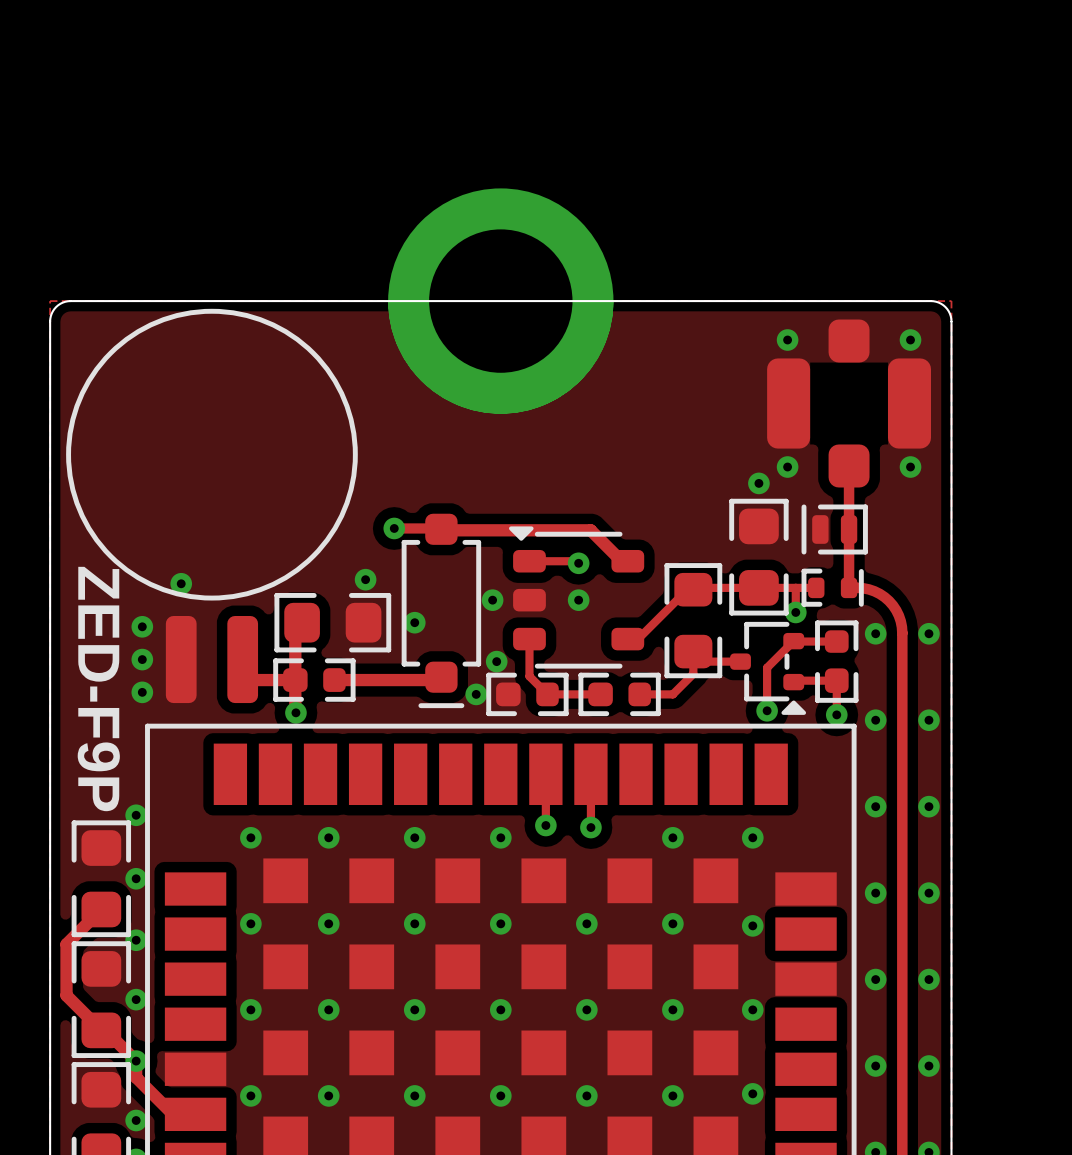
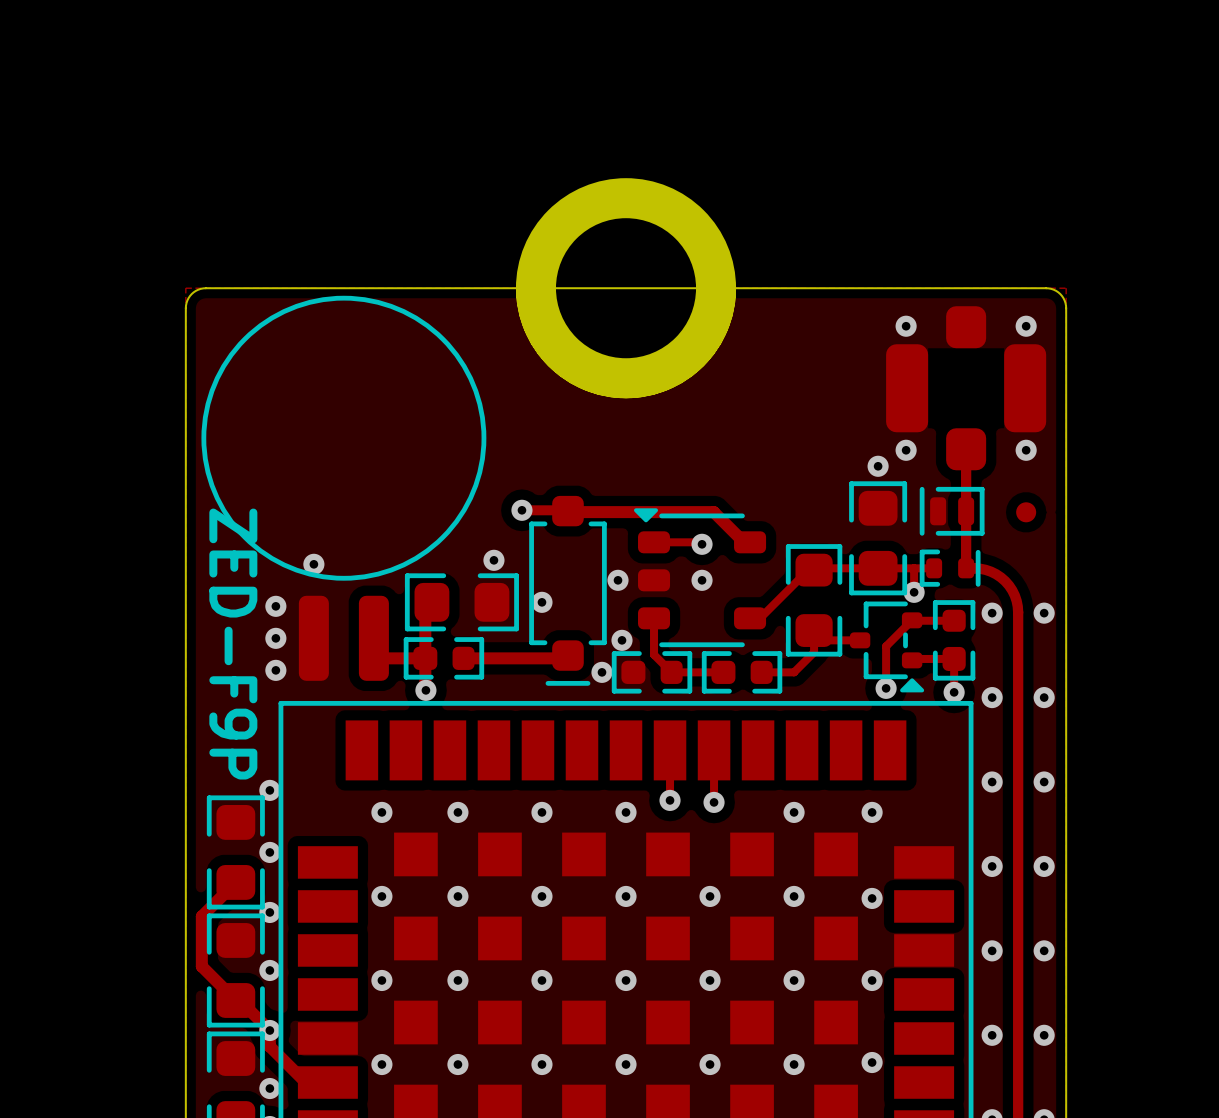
part: none -> (1026, 512)

